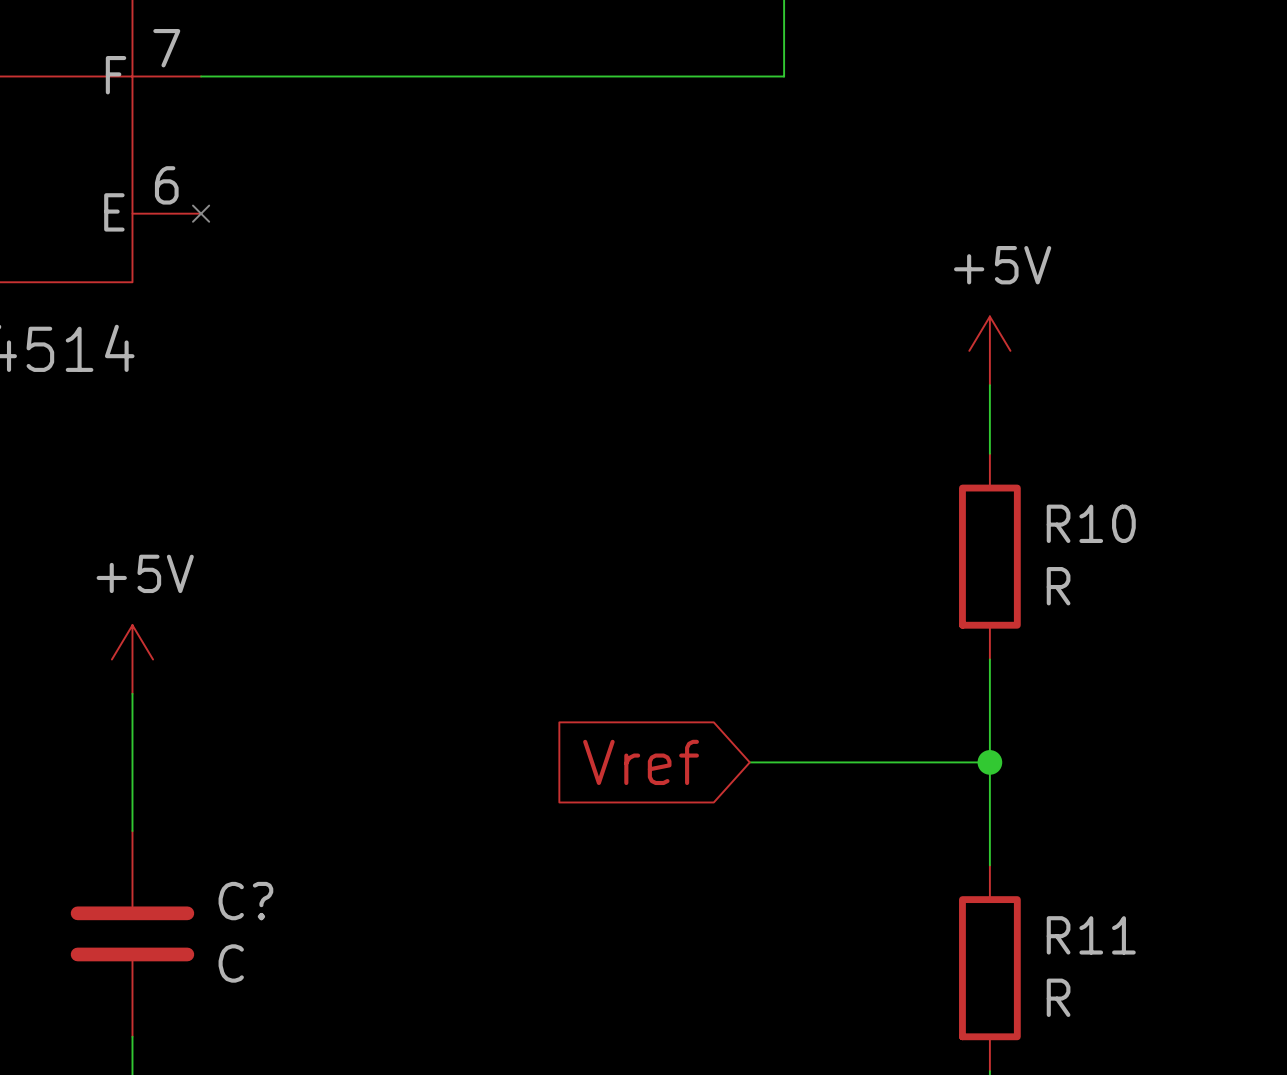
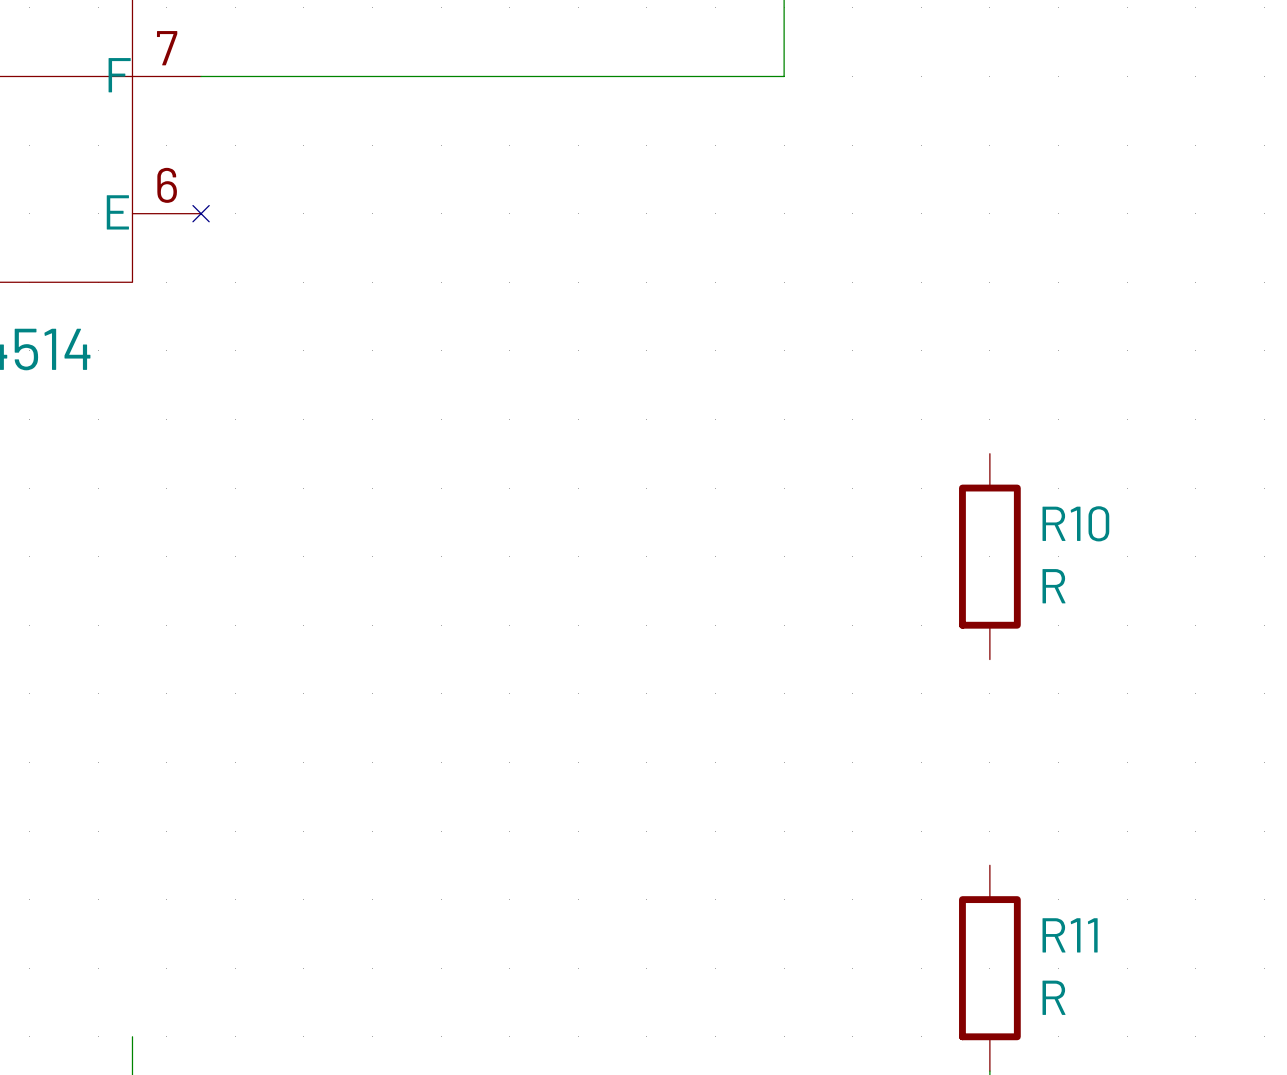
power symbol: +5V (989, 350) -> none
wire: (989, 385) (989, 453) -> none
power symbol: +5V (132, 659) -> none
wire: (989, 659) (989, 865) -> none
wire: (132, 693) (132, 831) -> none
global label: Vref (641, 762) -> none
wire: (749, 762) (989, 762) -> none
junction: (989, 762) -> none
C?: C (132, 933) -> none

